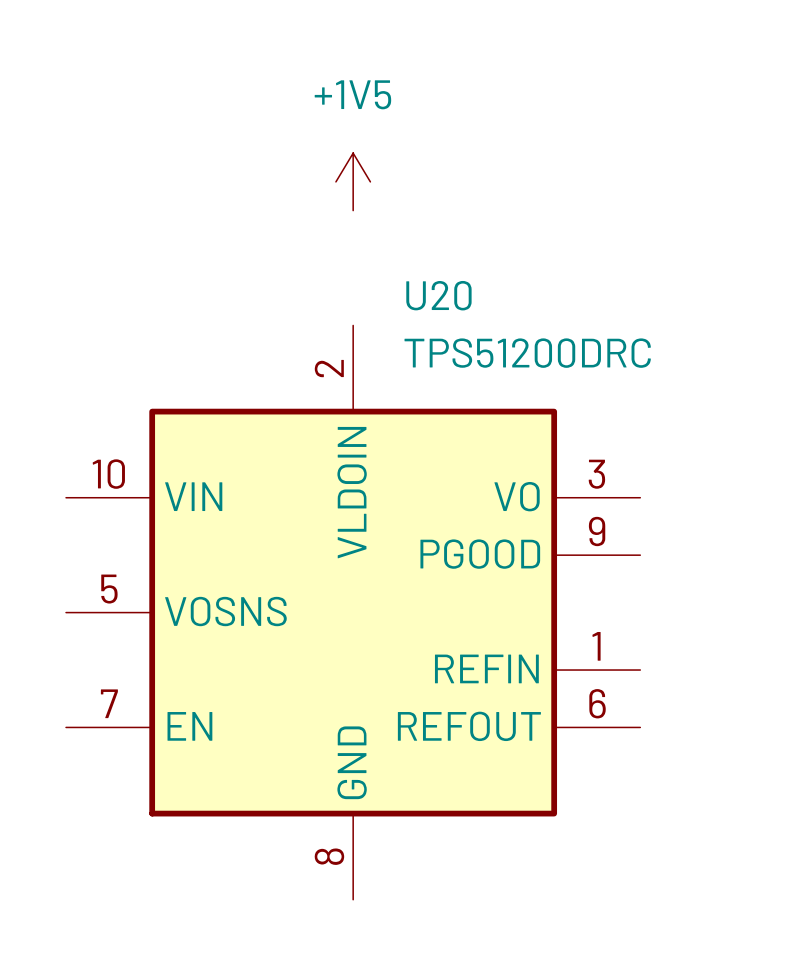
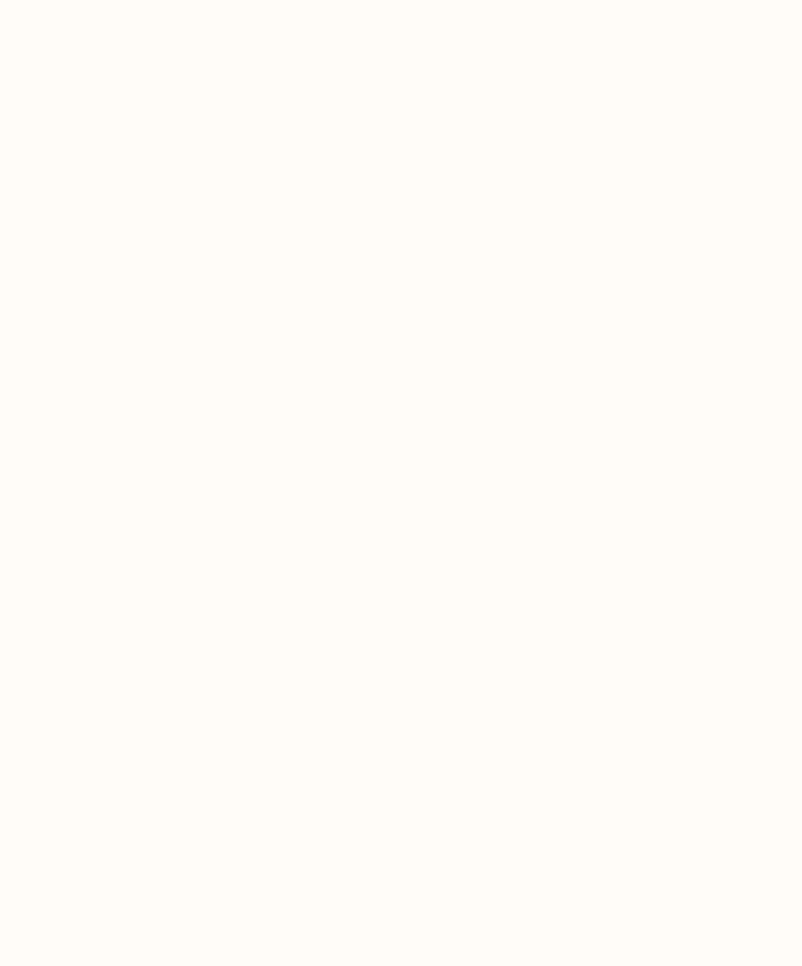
power symbol: +1V5 (353, 181) -> none
U20: TPS51200DRC (353, 612) -> none

